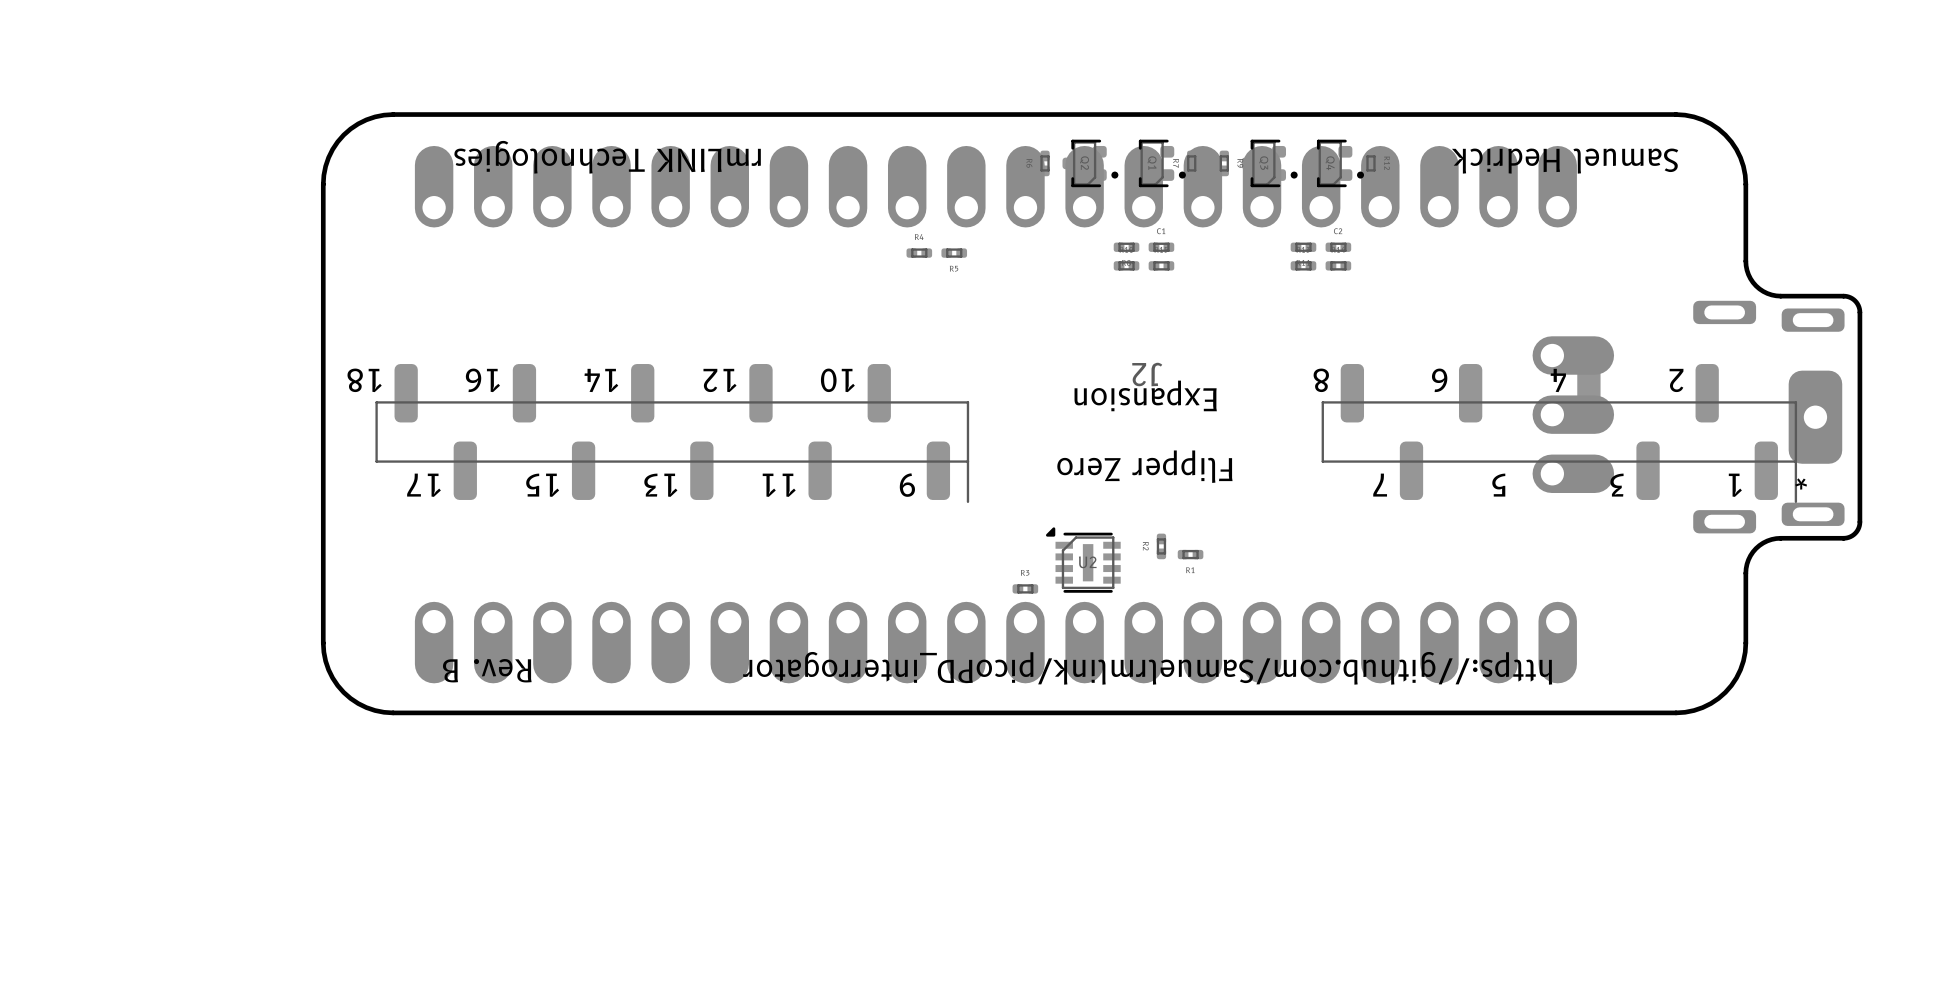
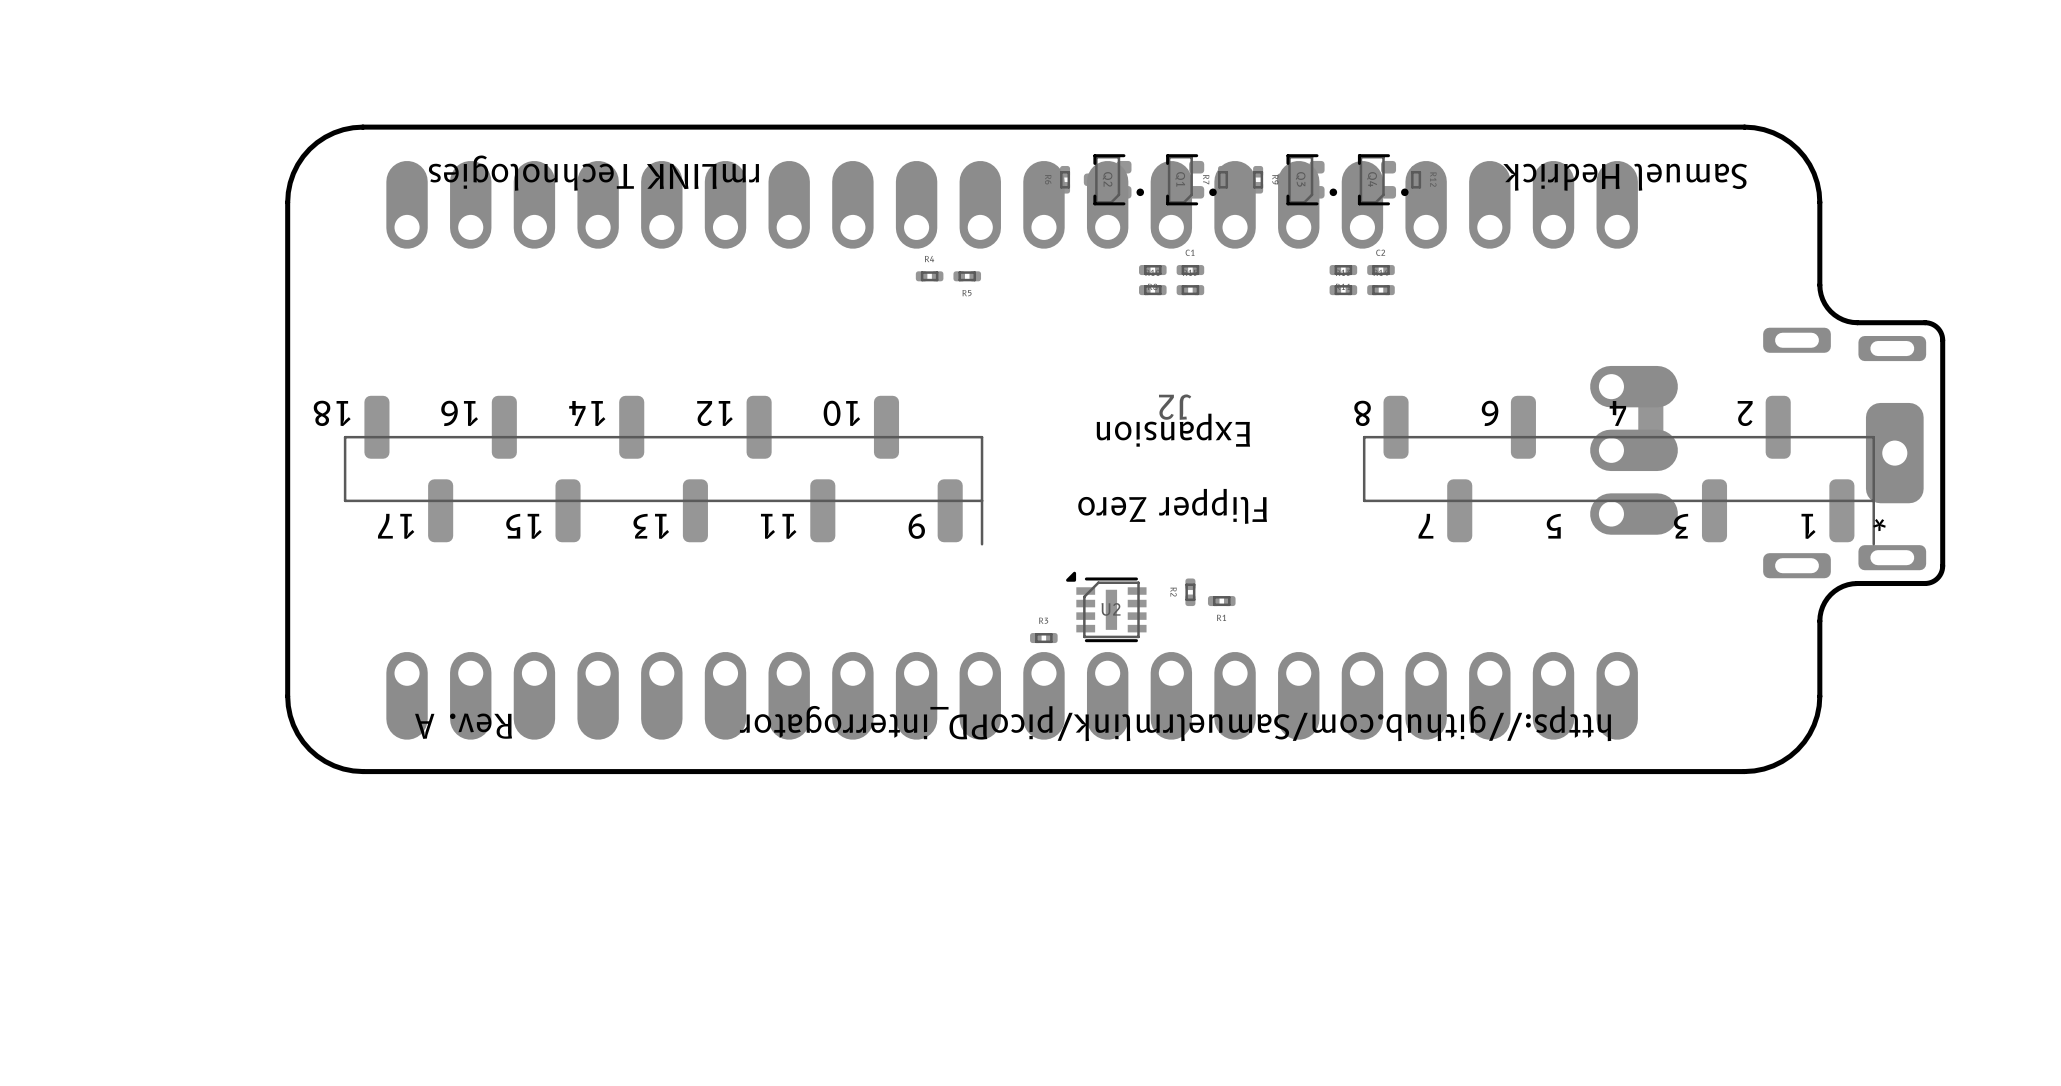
text: Rev. B (487, 670) -> Rev. A (463, 726)

